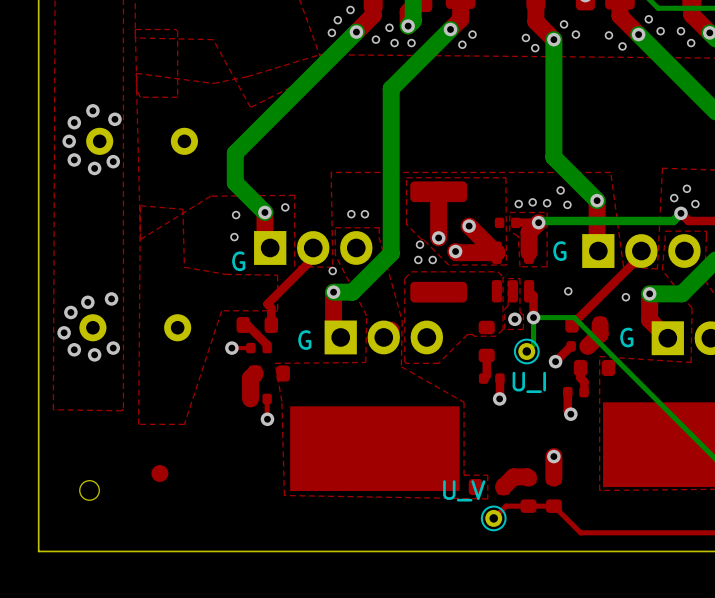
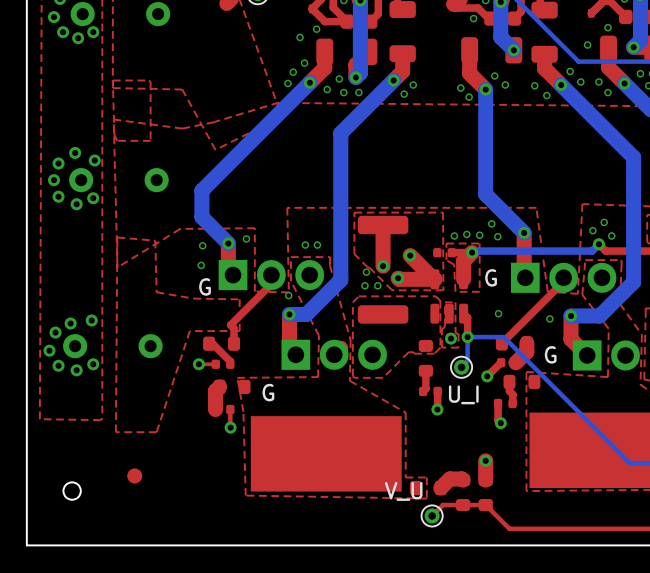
text position: G (304, 340) -> G (268, 392)
text: U_V (464, 490) -> V_U (403, 491)

